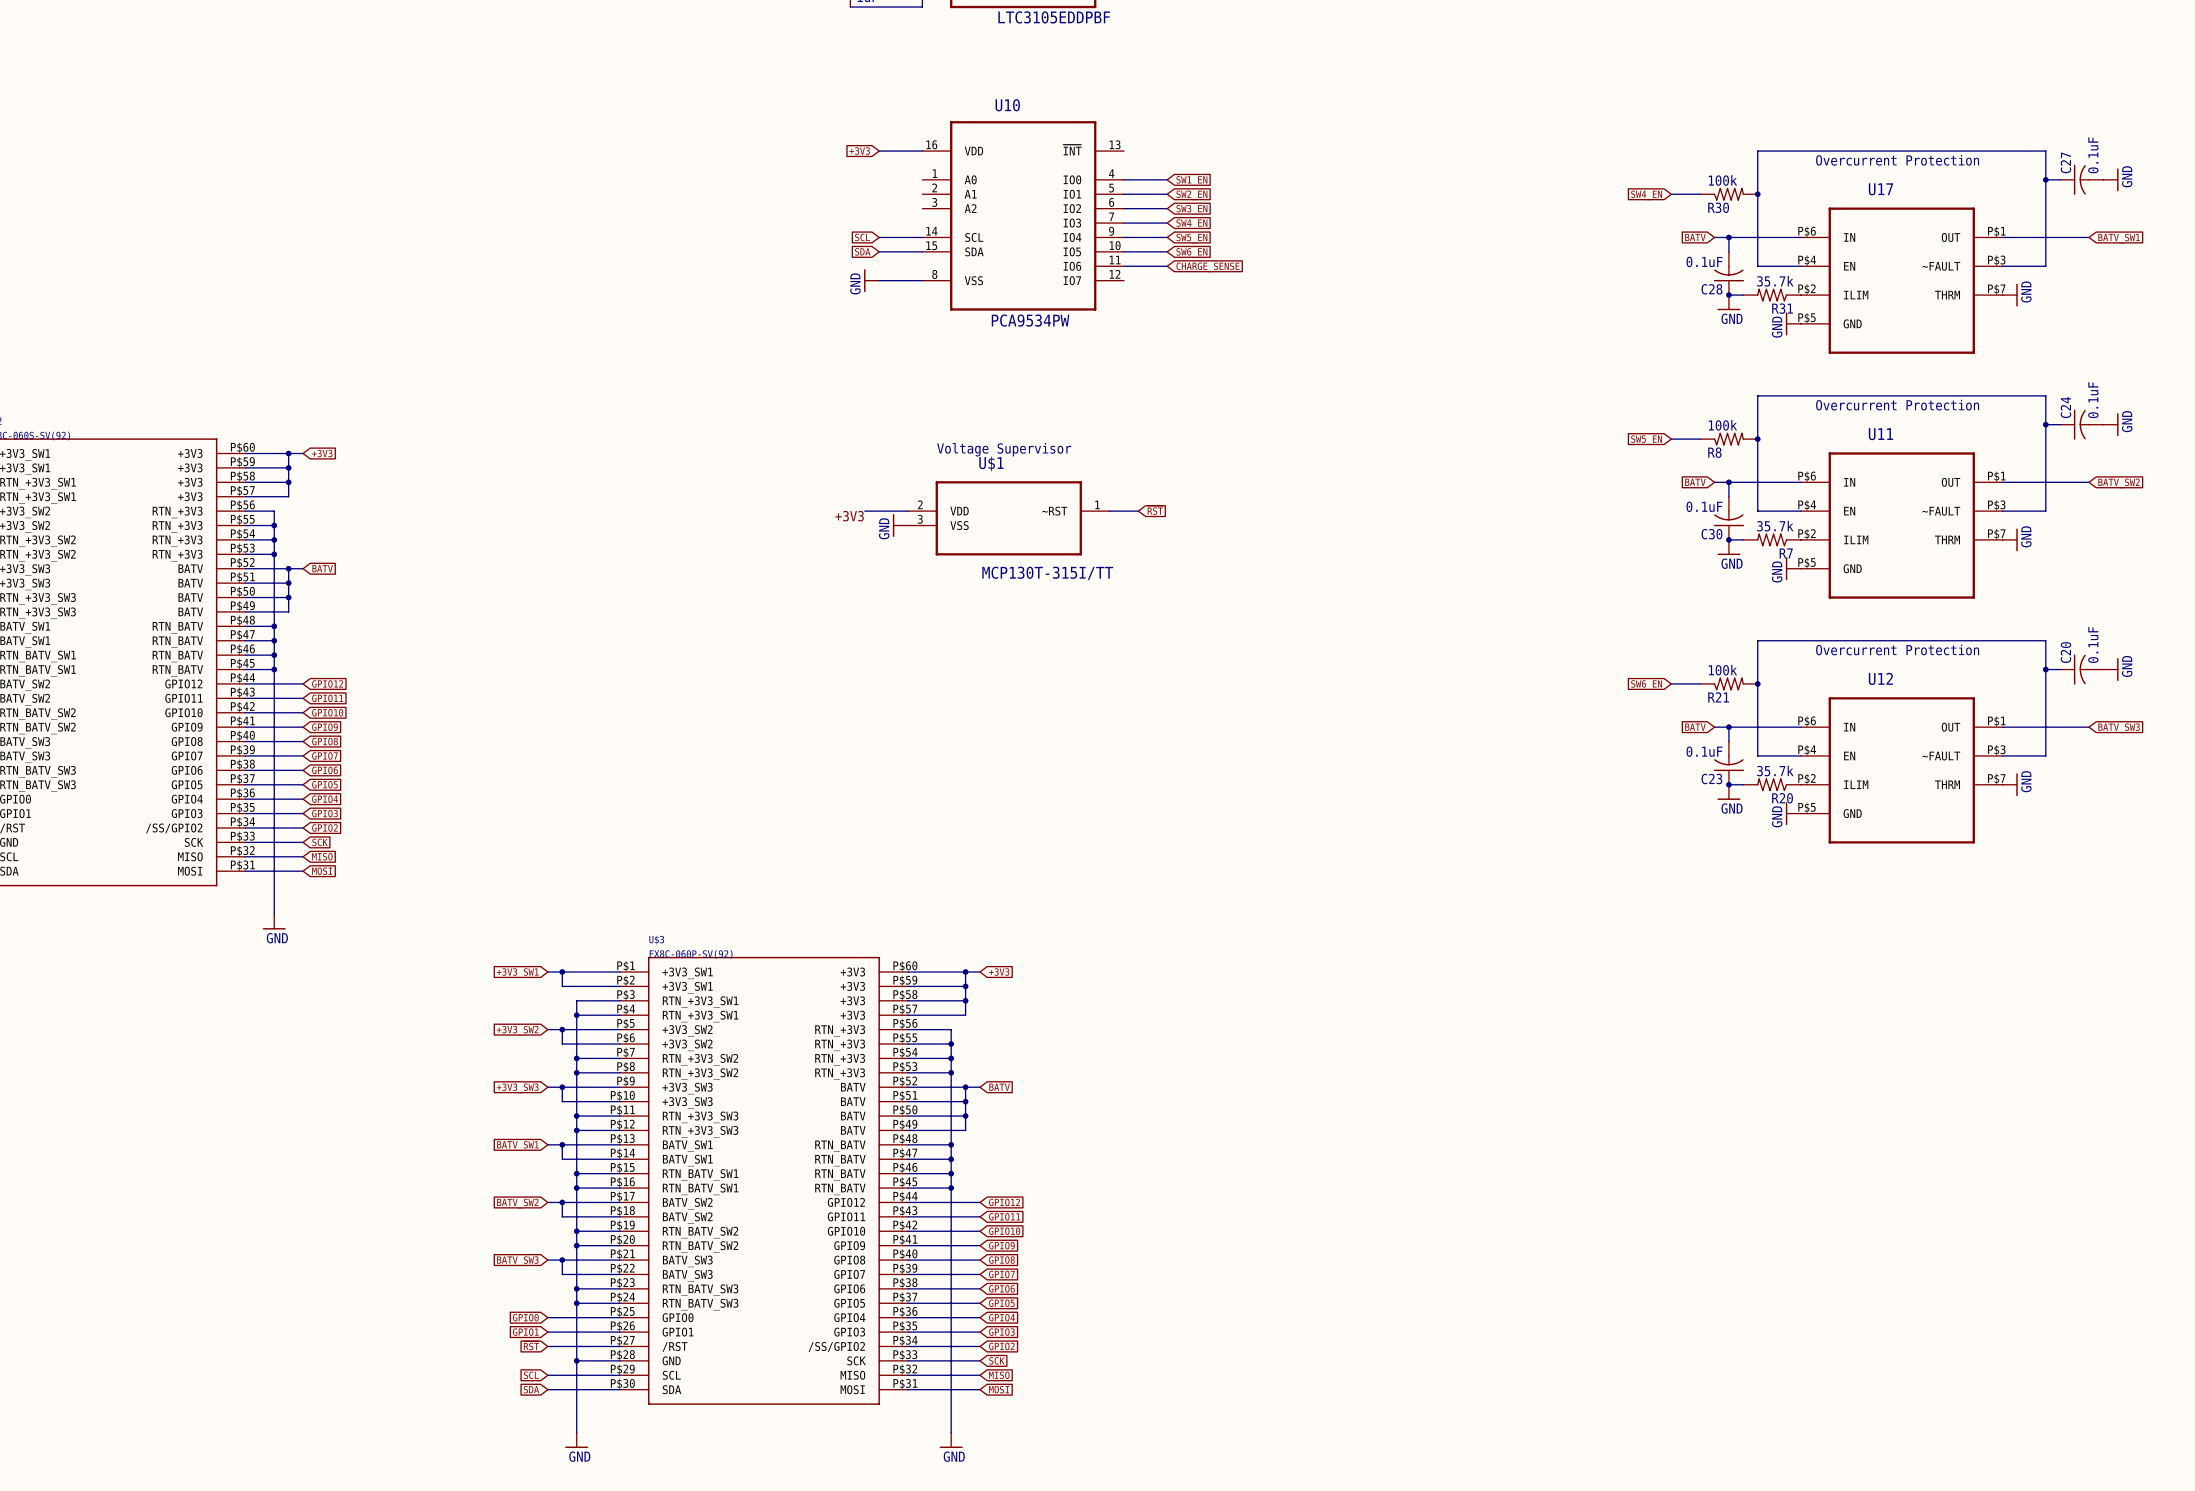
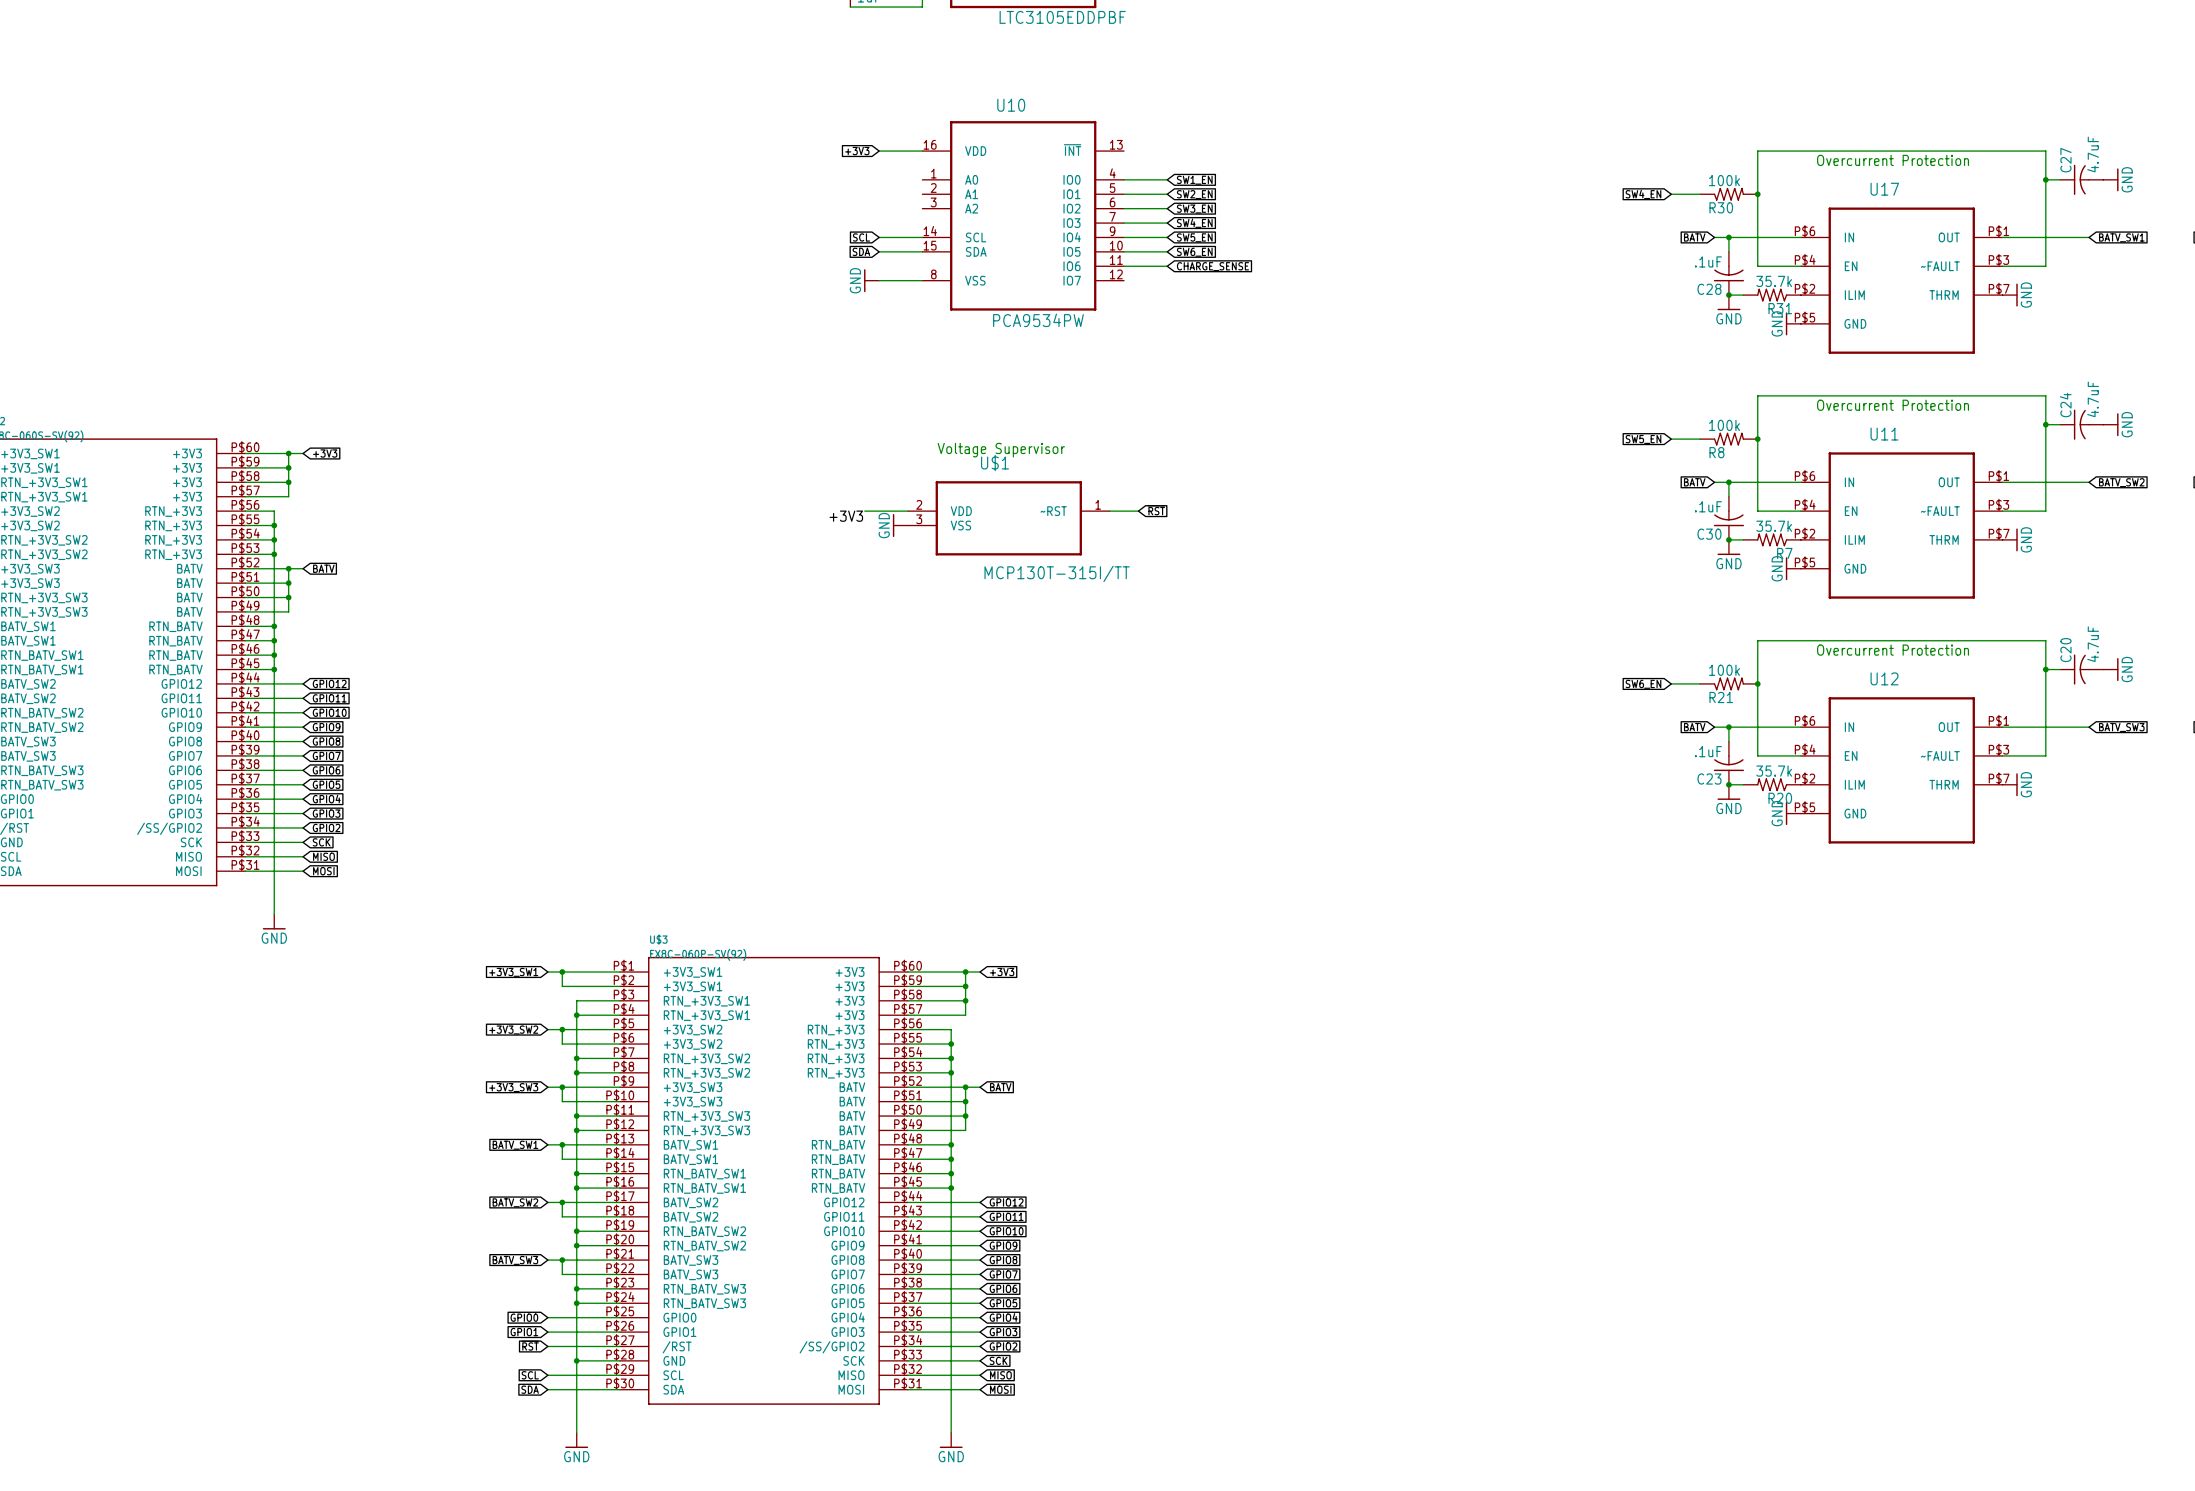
C27 value: 0.1uF (2093, 155) -> 4.7uF (2093, 154)
C28 value: 0.1uF (1704, 261) -> .1uF (1708, 261)
C24 value: 0.1uF (2093, 400) -> 4.7uF (2093, 399)
C30 value: 0.1uF (1704, 506) -> .1uF (1708, 506)
C20 value: 0.1uF (2093, 645) -> 4.7uF (2093, 644)
C23 value: 0.1uF (1704, 751) -> .1uF (1708, 751)

